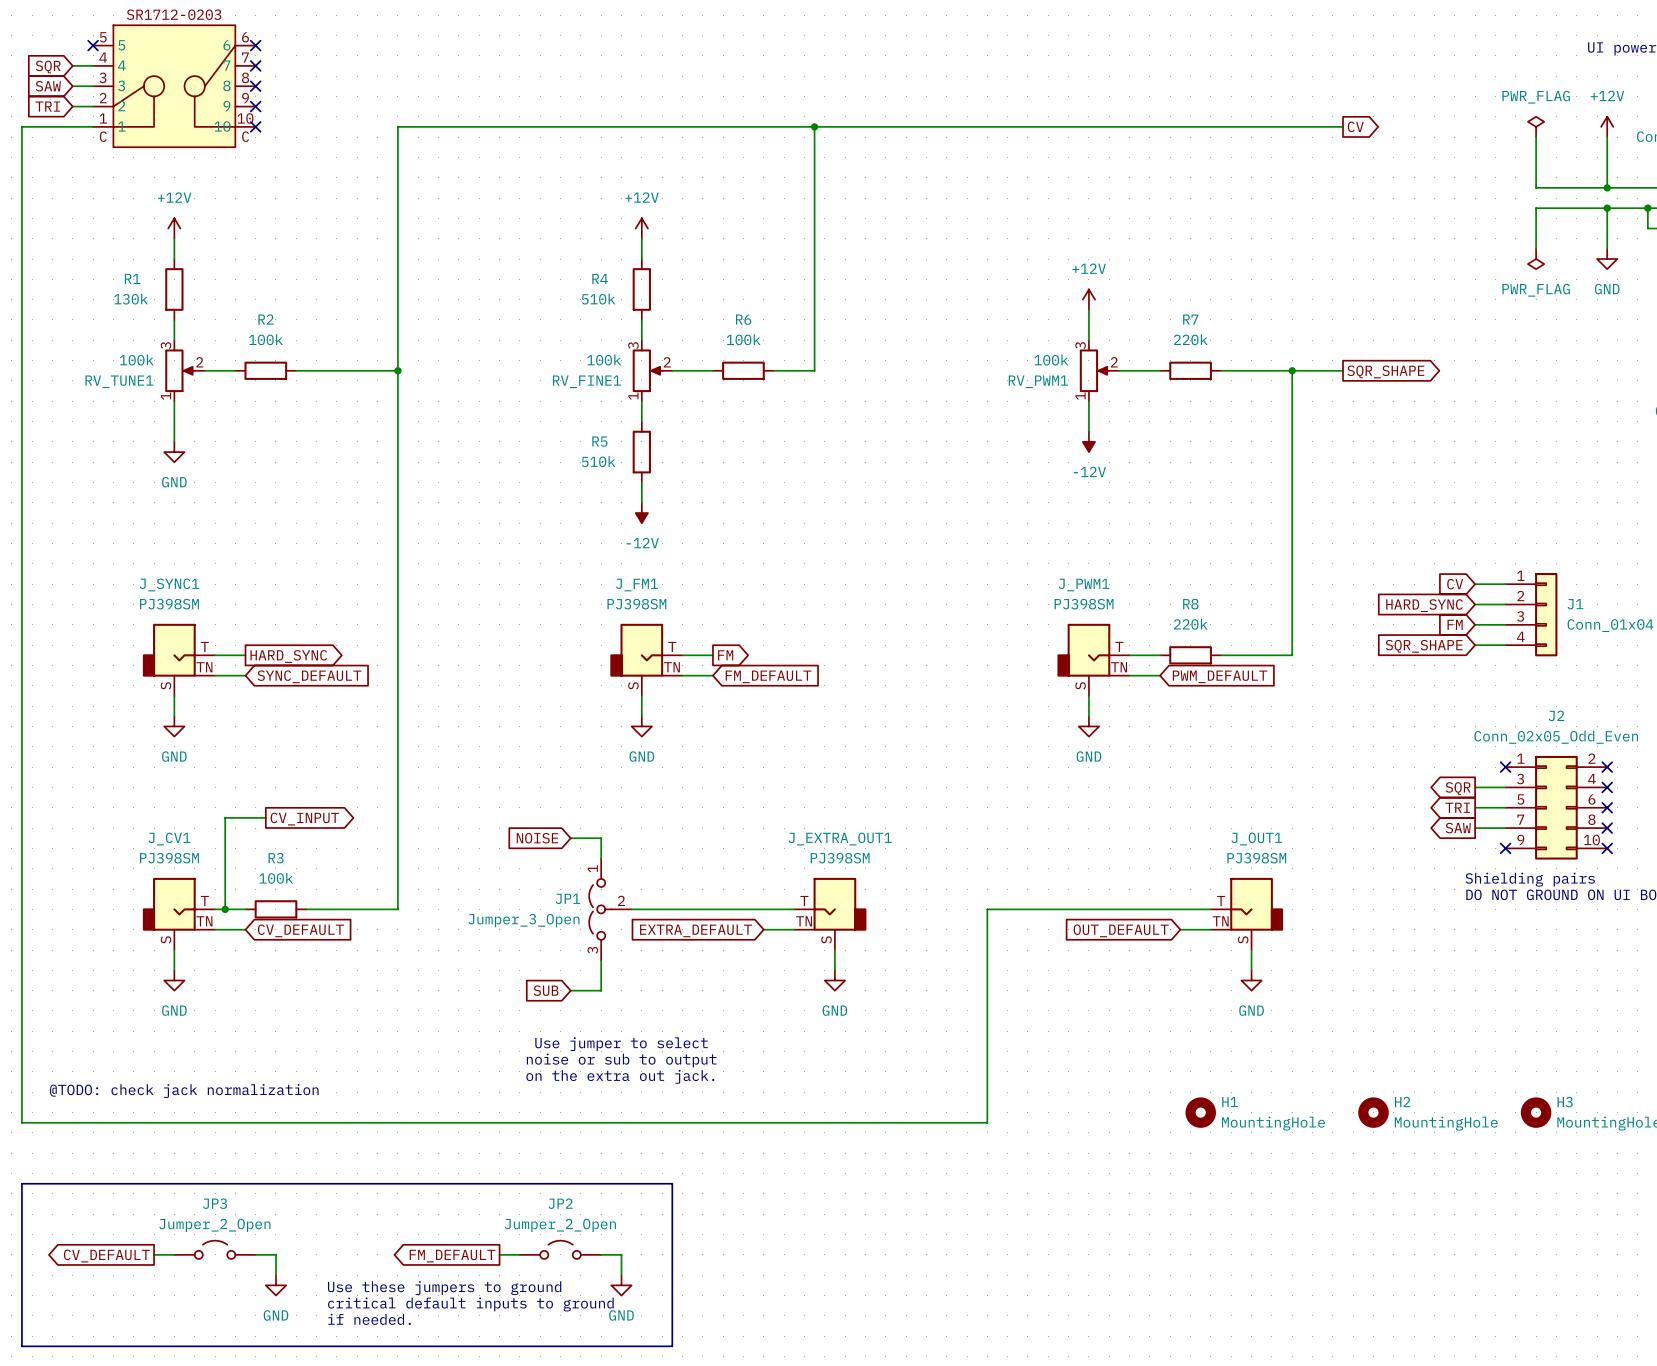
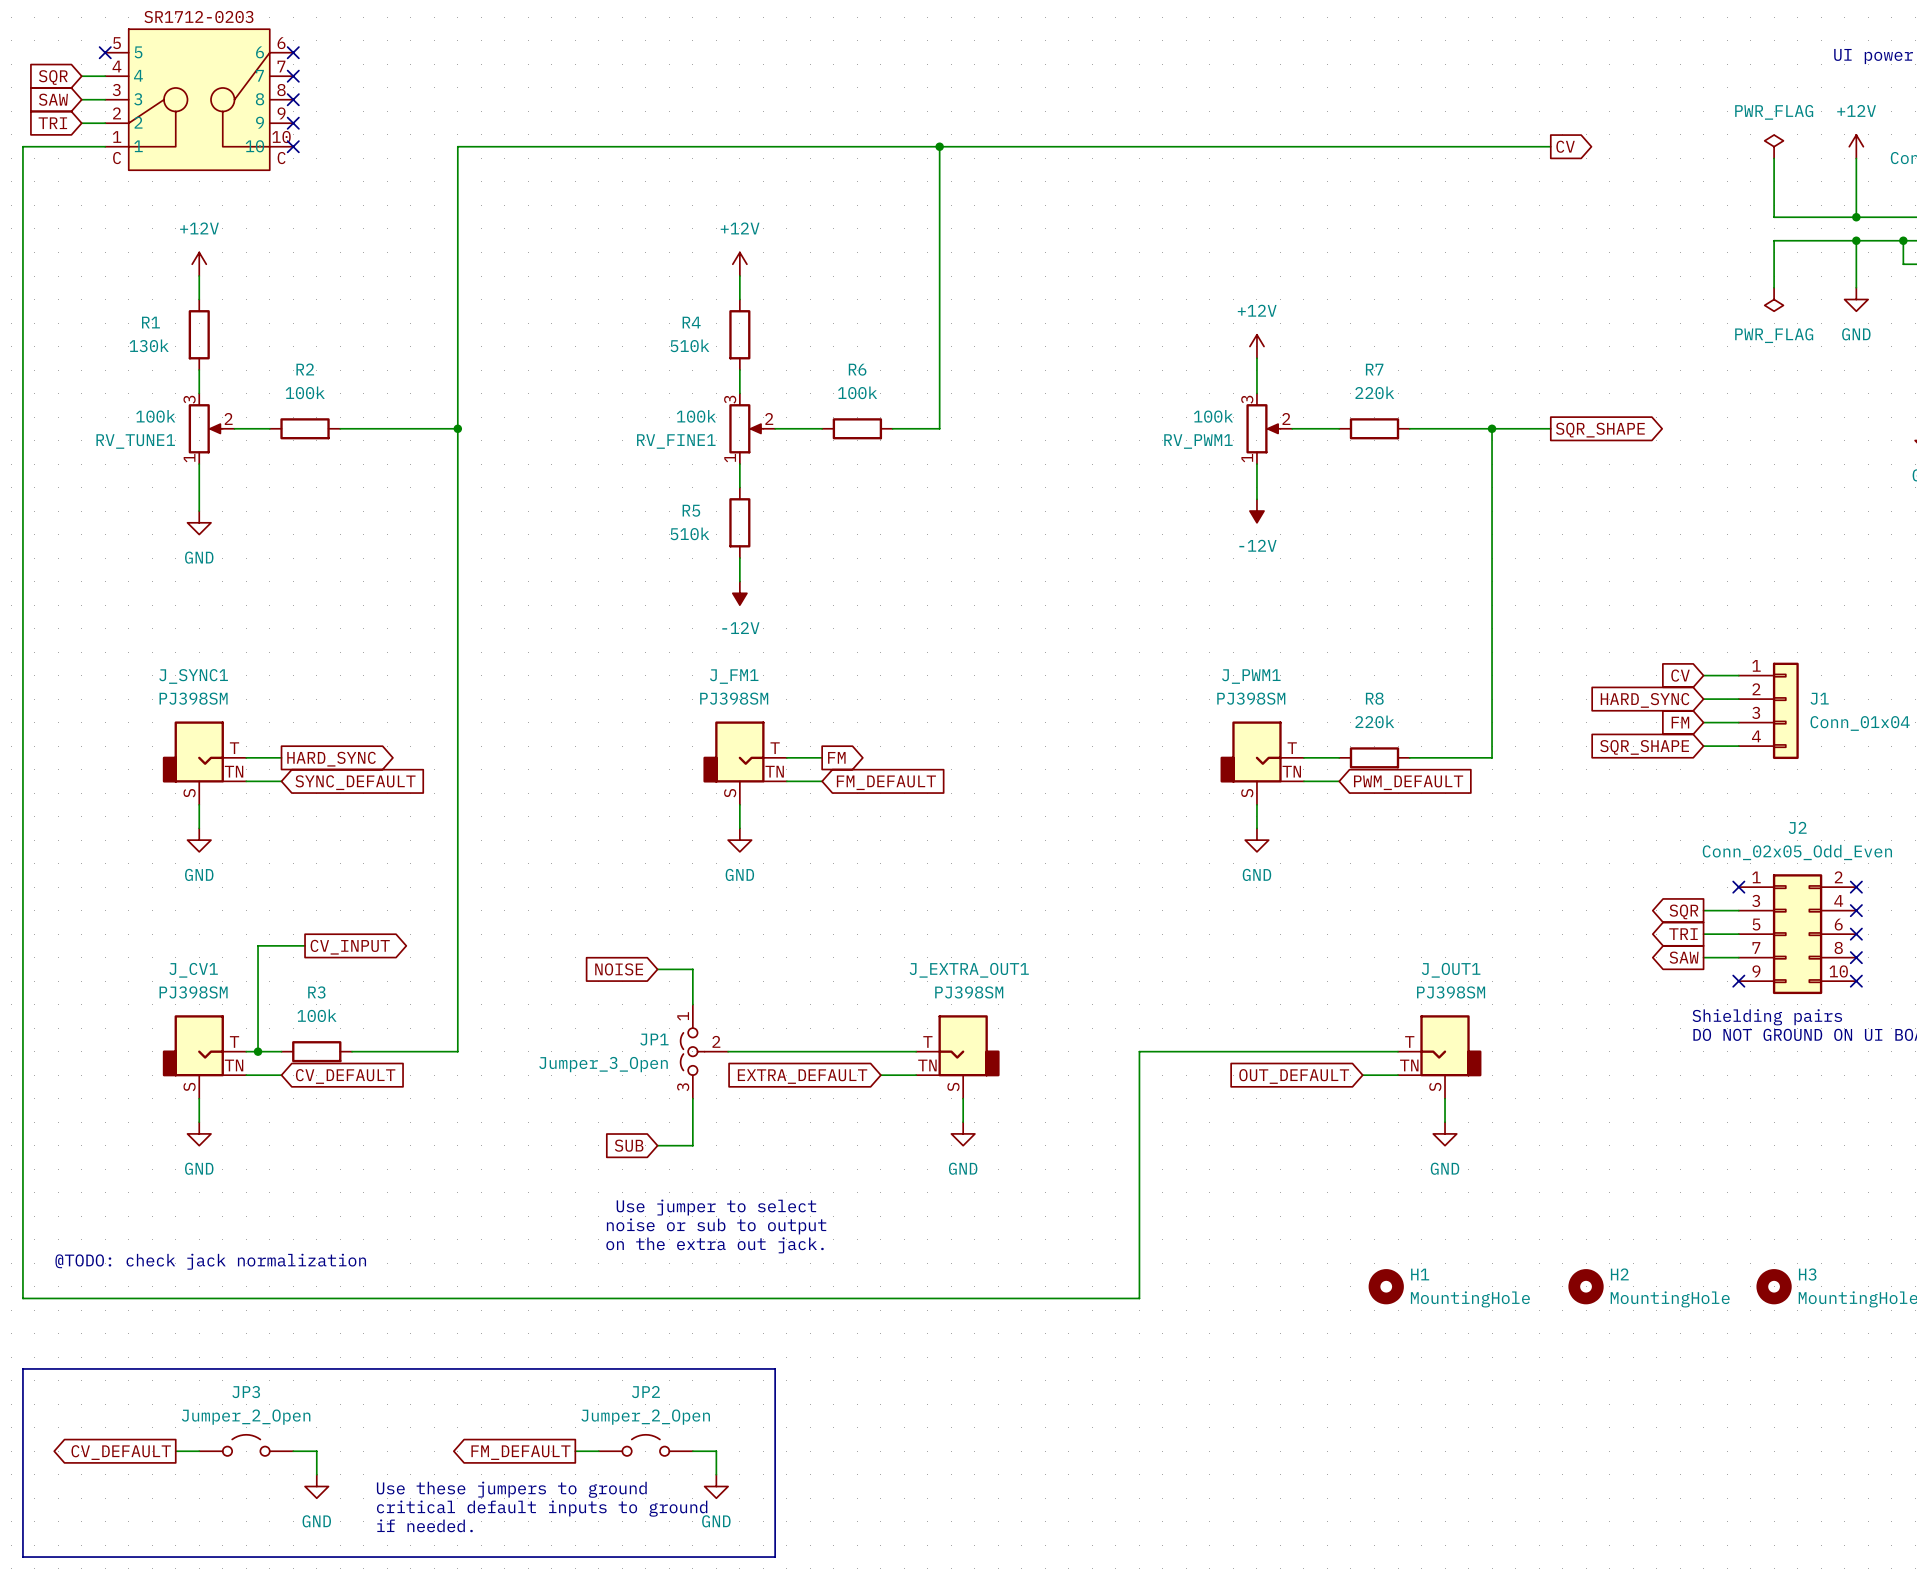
JP1 symbol: [589, 858, 632, 961] -> [680, 1004, 729, 1099]

